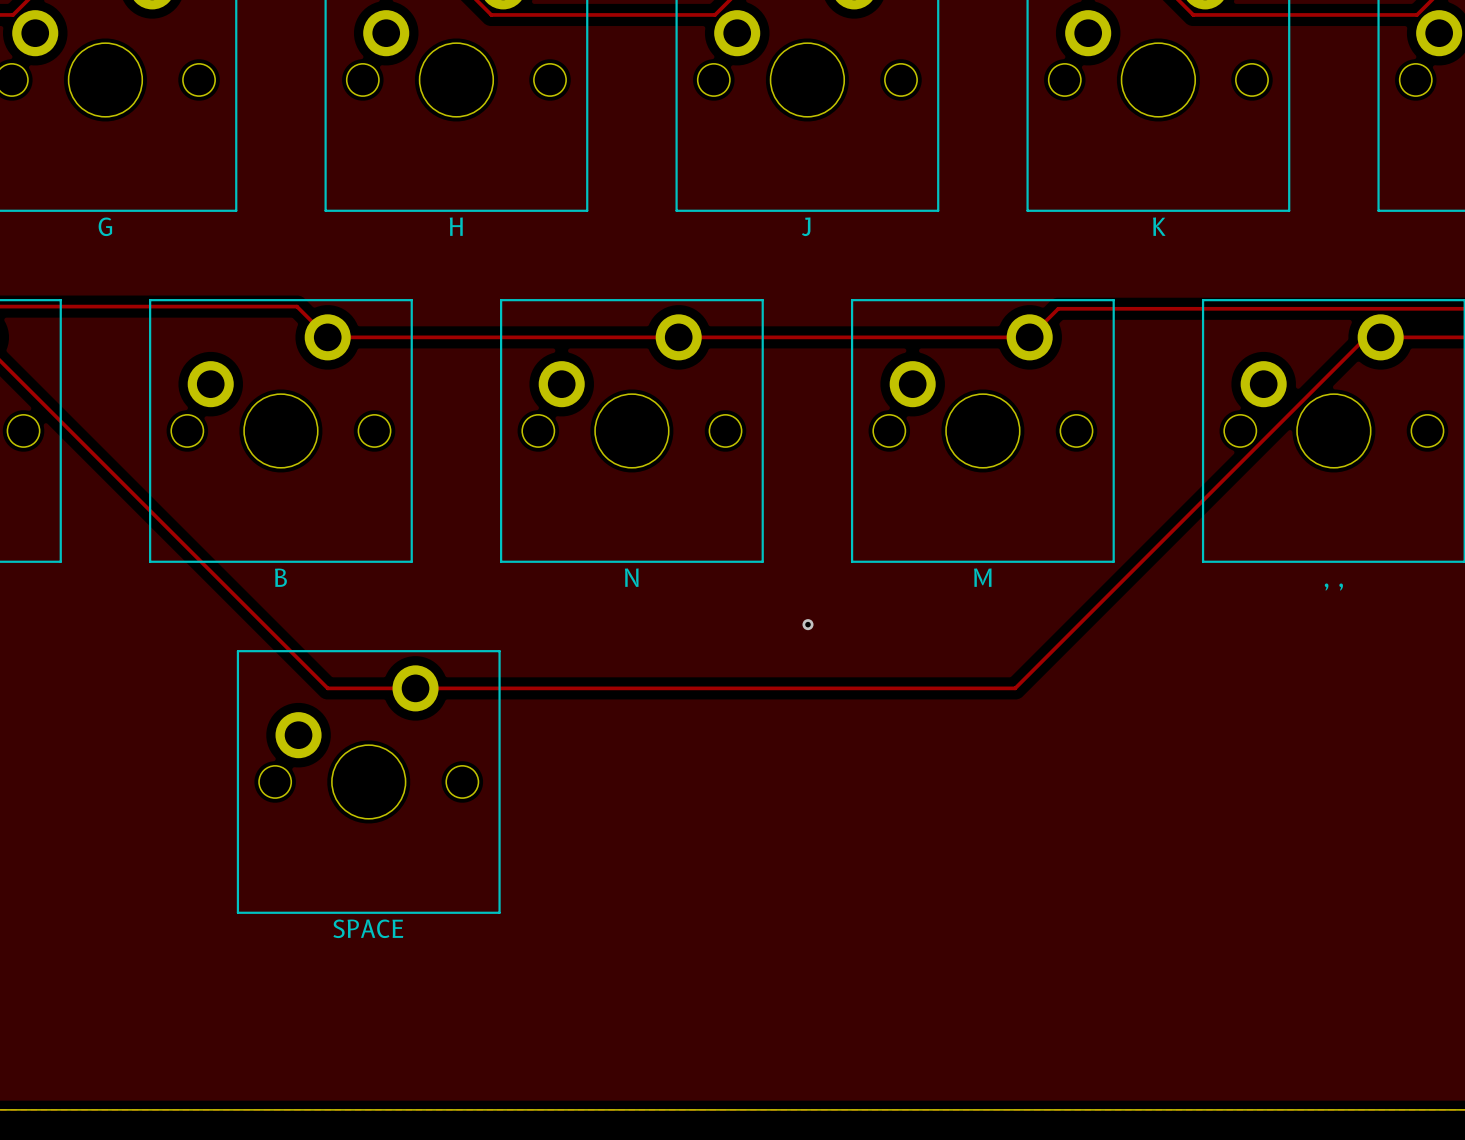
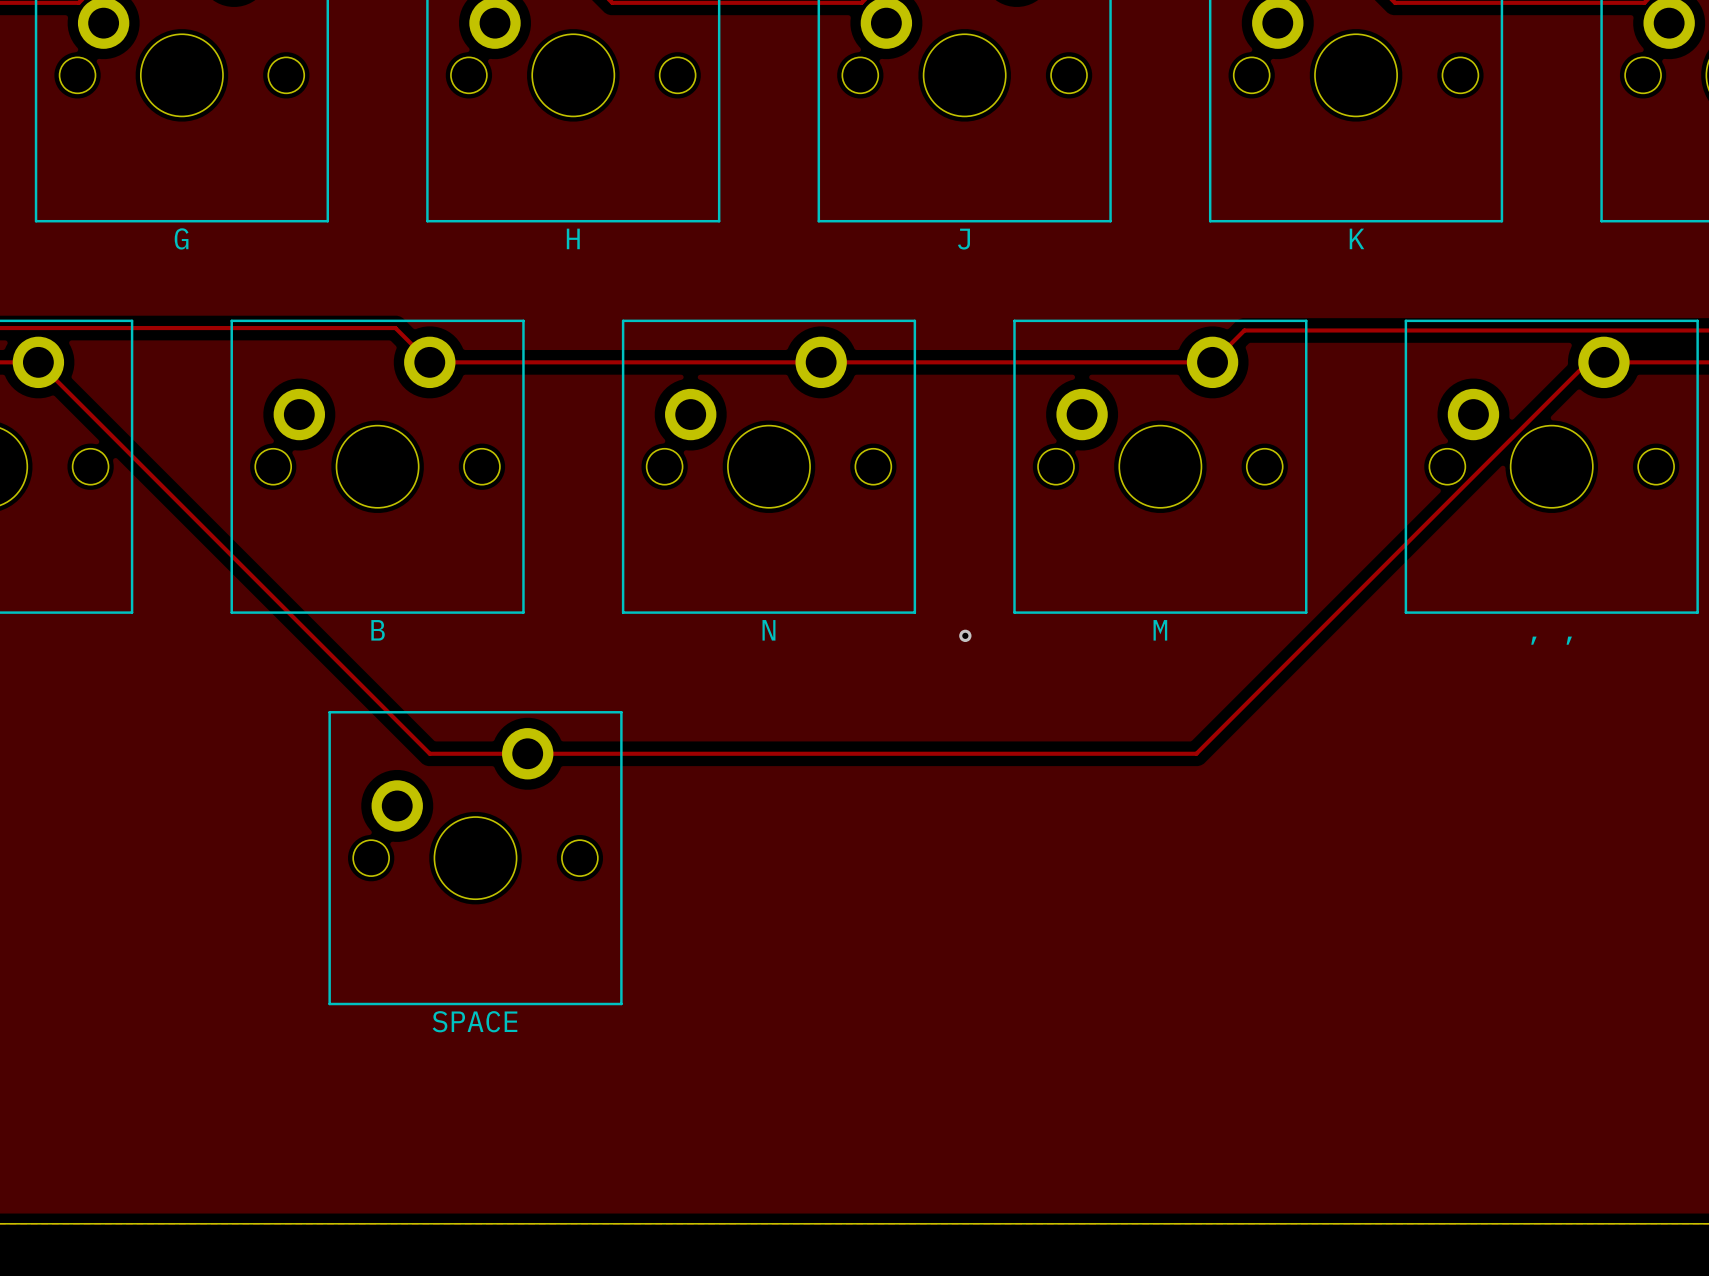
via position: (808, 624) -> (965, 635)

